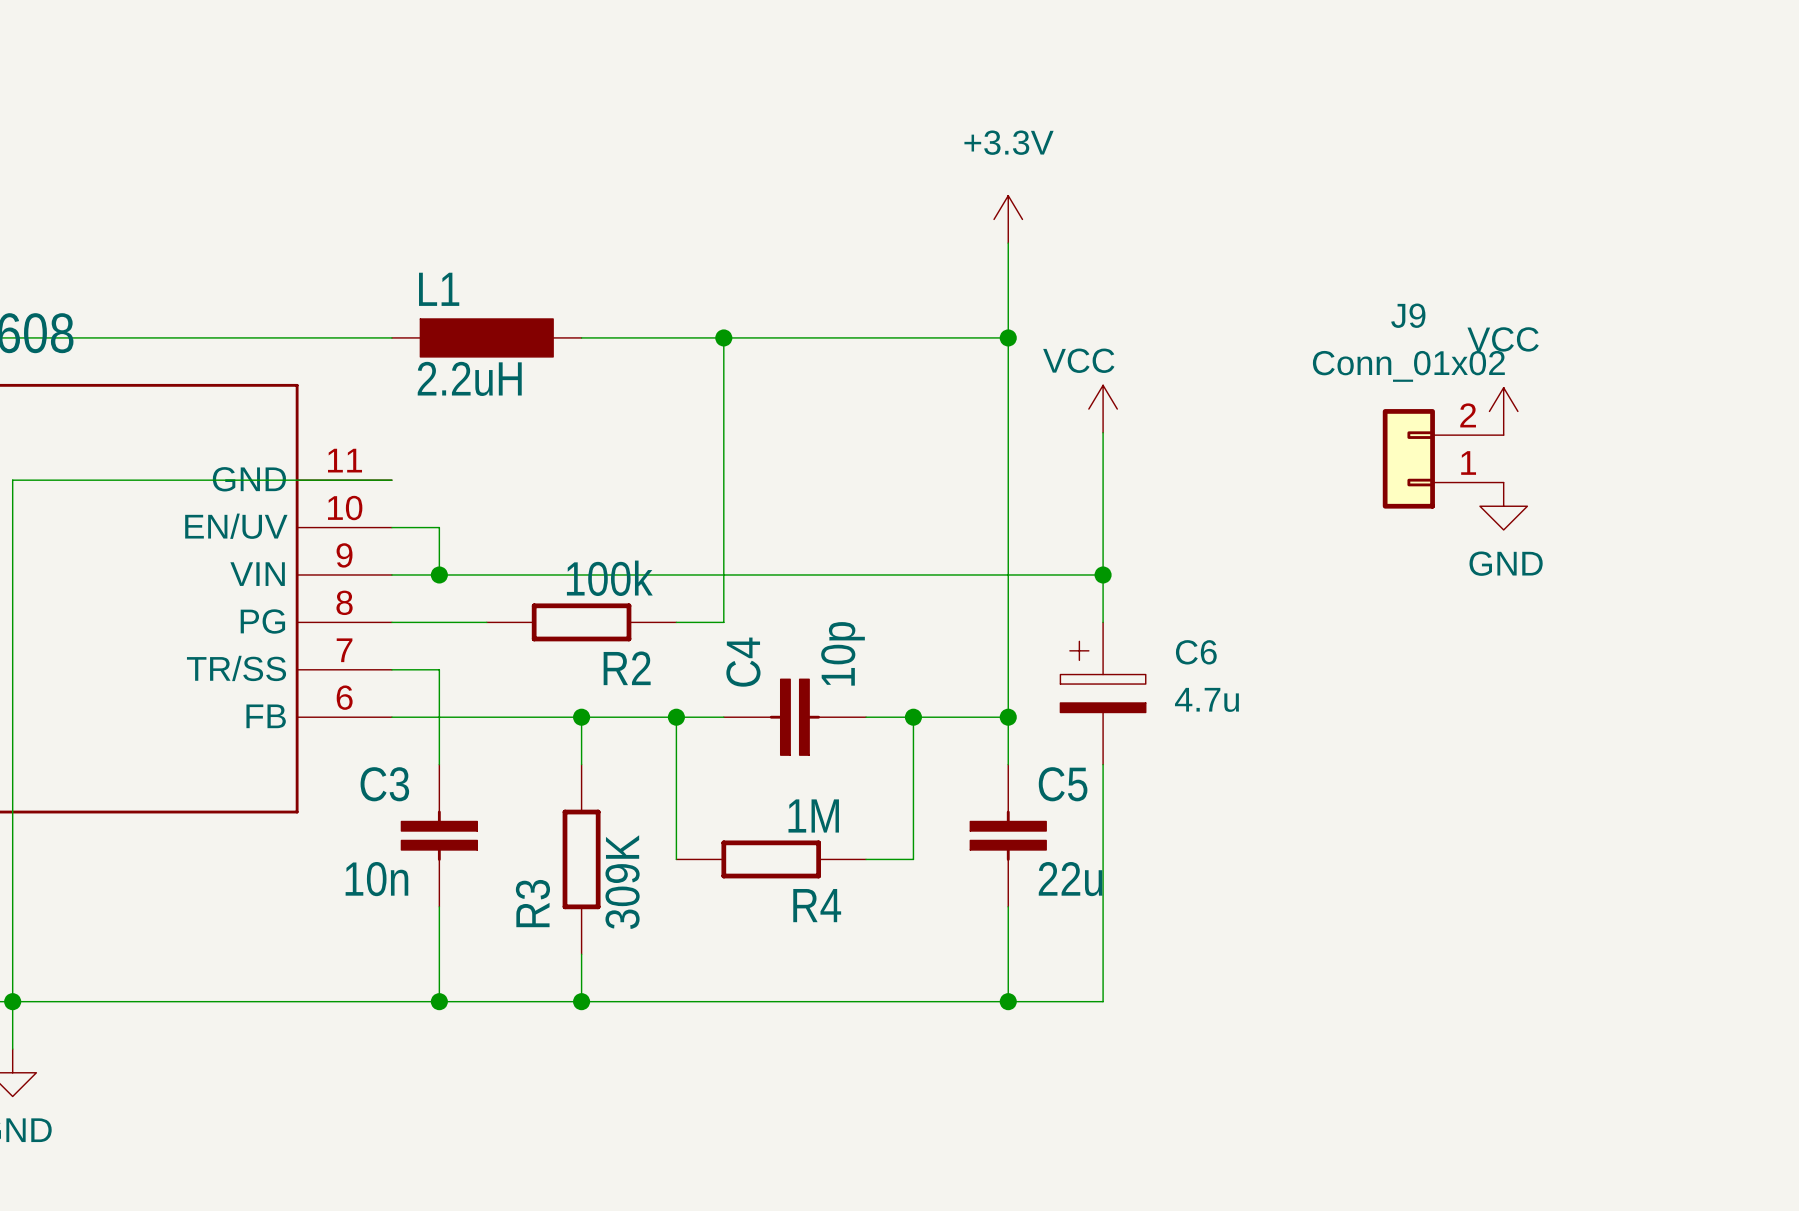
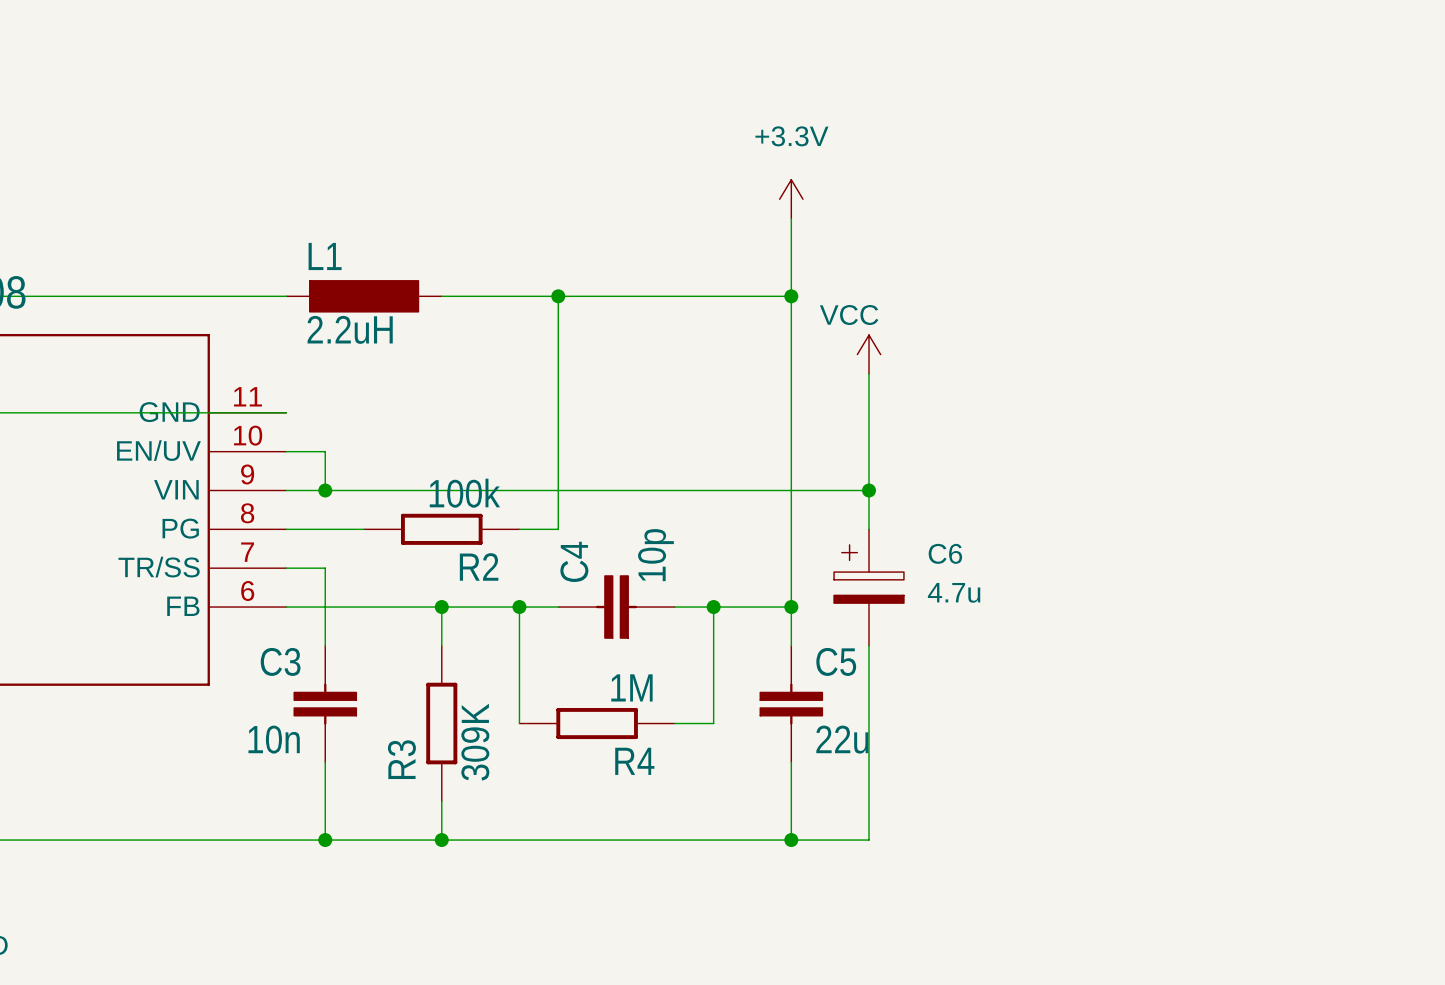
power symbol: VCC (1503, 411) -> none
J9: Conn_01x02 (1443, 458) -> none
power symbol: GND (1503, 506) -> none

